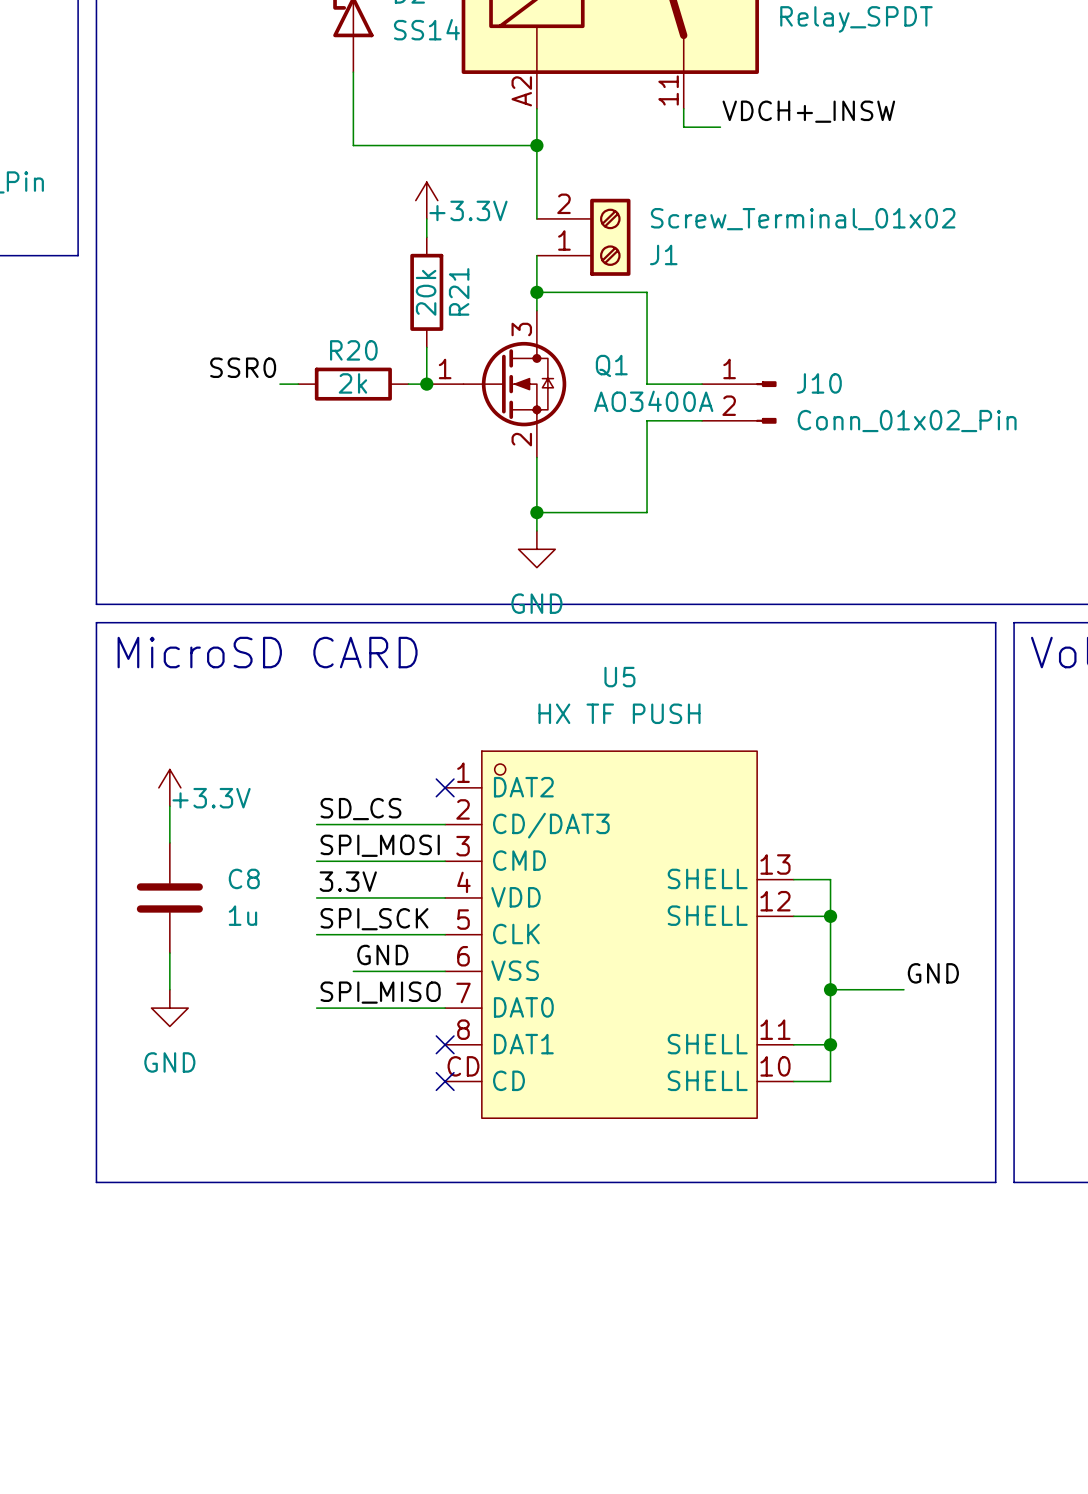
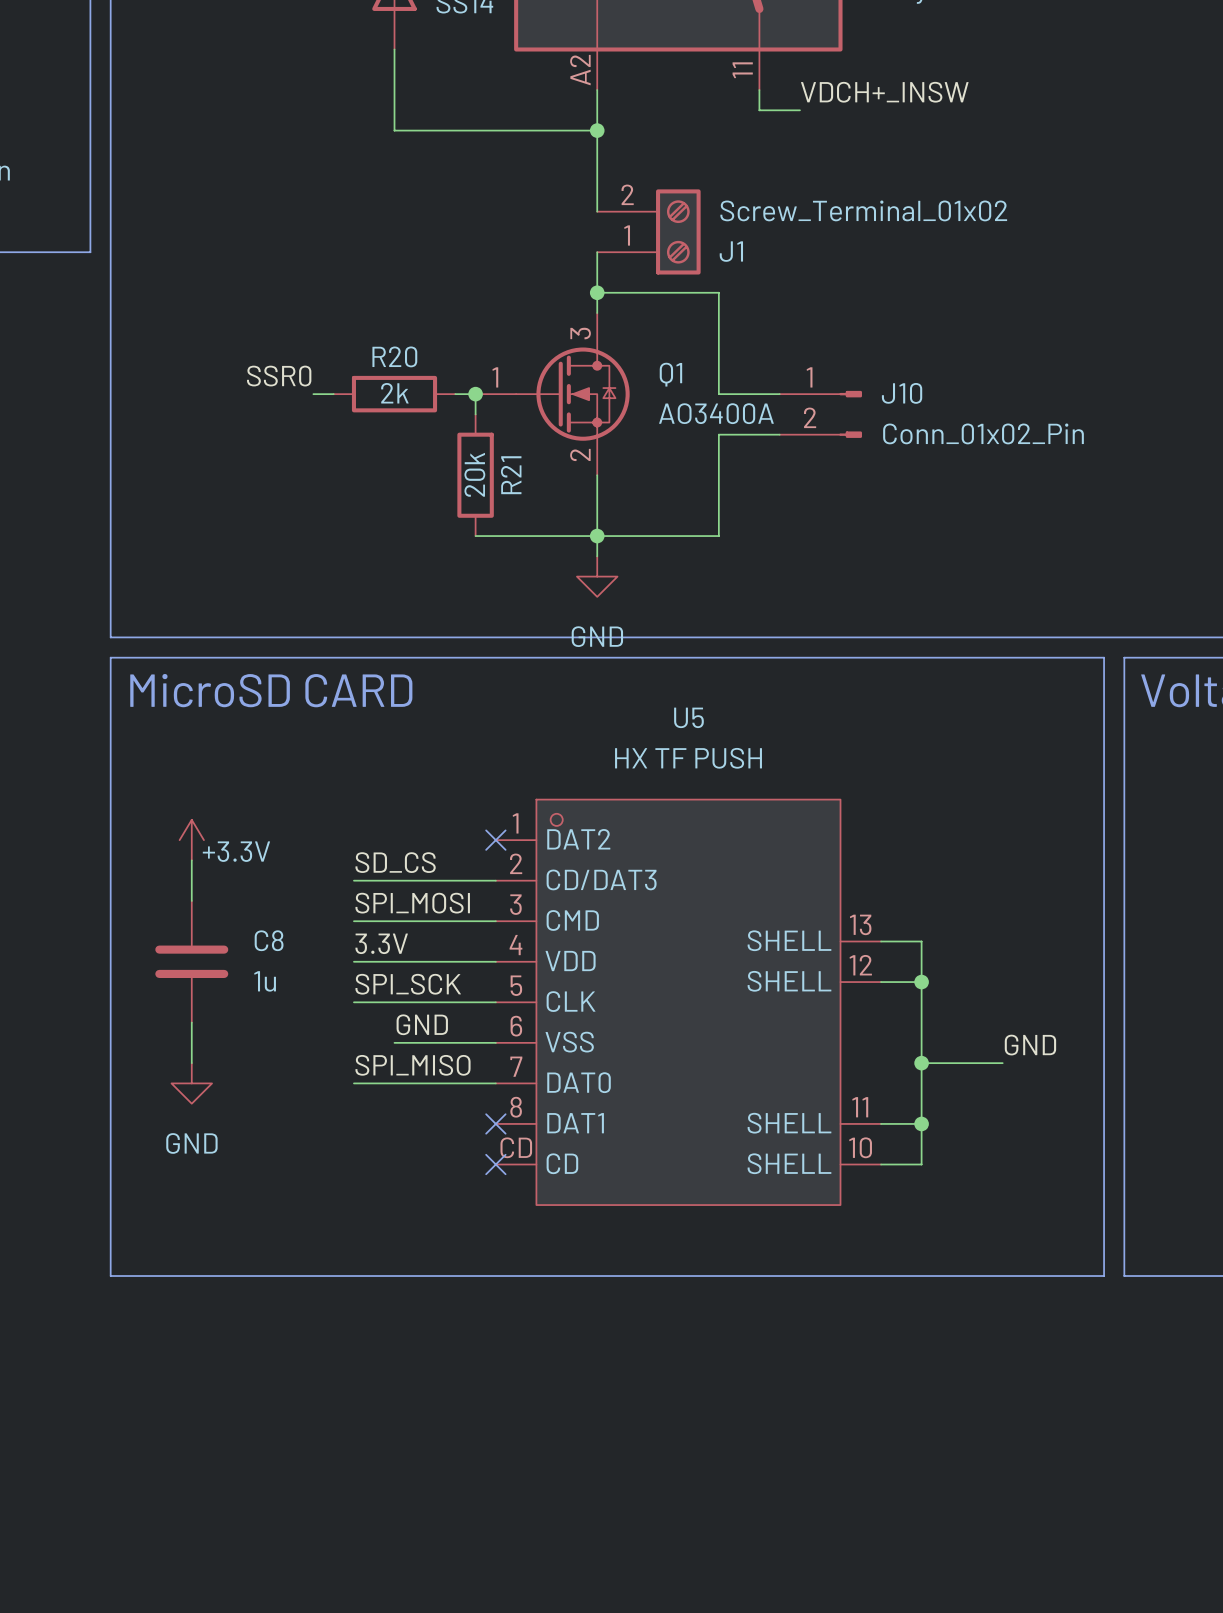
power symbol: +3.3V (426, 200) -> none
wire: (426, 218) (426, 237) -> none
R21 position: (426, 292) -> (475, 475)
wire: (426, 347) (426, 384) -> (475, 414) (475, 394)
wire: none -> (475, 536) (597, 536)

